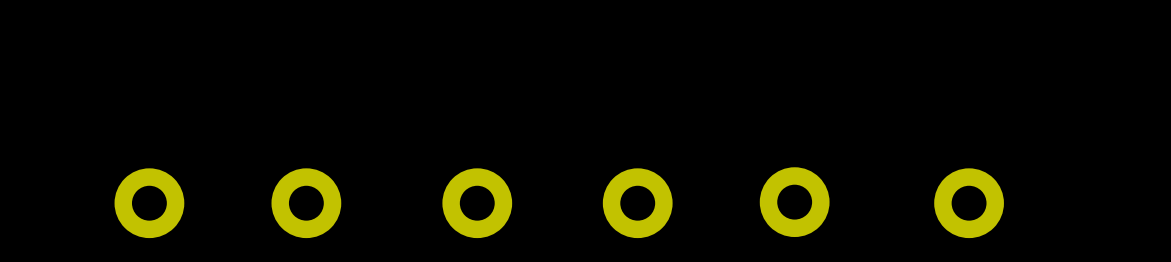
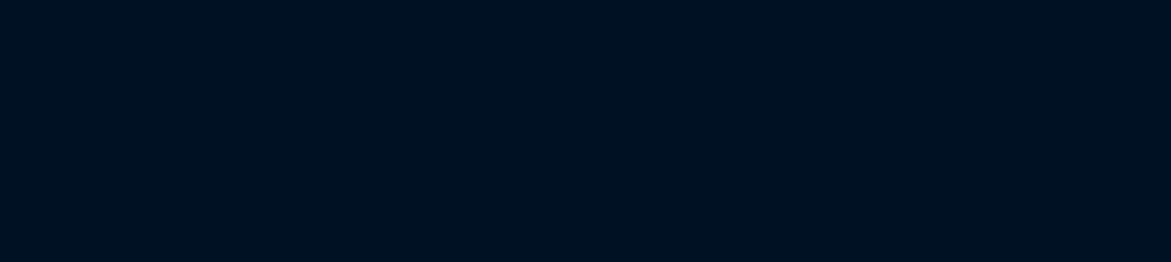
part: (794, 202) -> none
part: (149, 203) -> none
part: (306, 203) -> none
part: (477, 203) -> none
part: (637, 203) -> none
part: (969, 203) -> none

